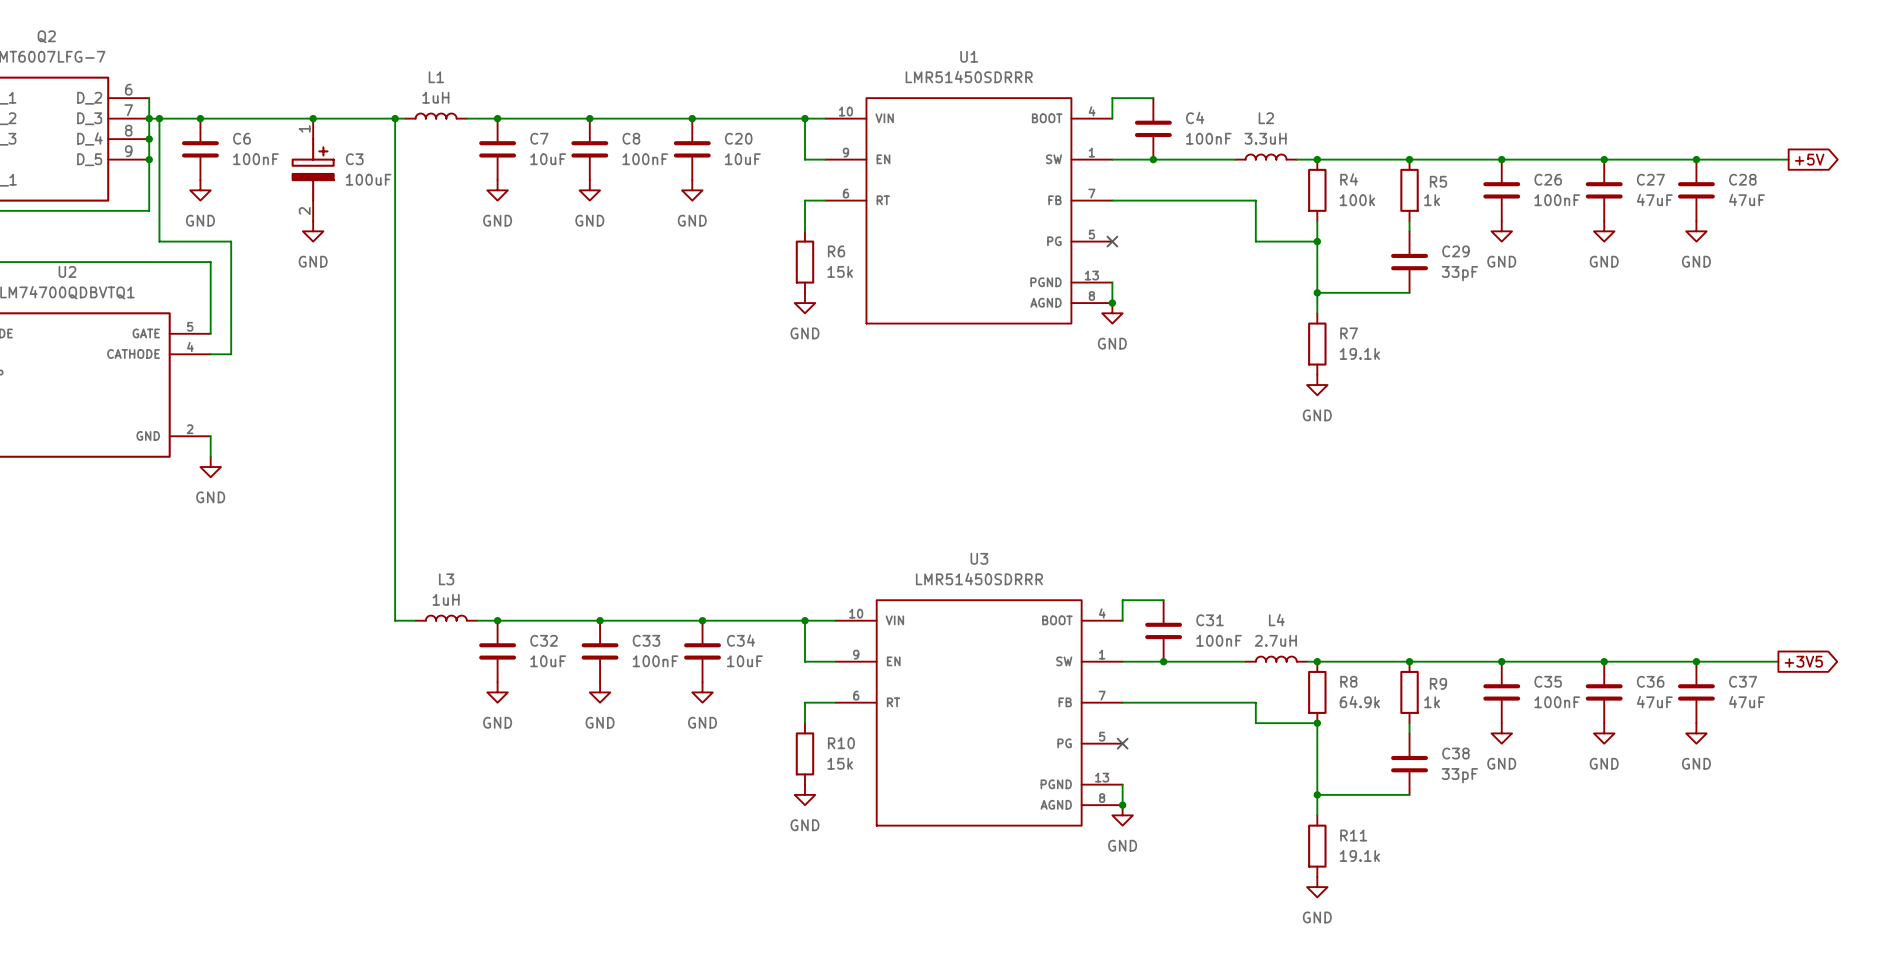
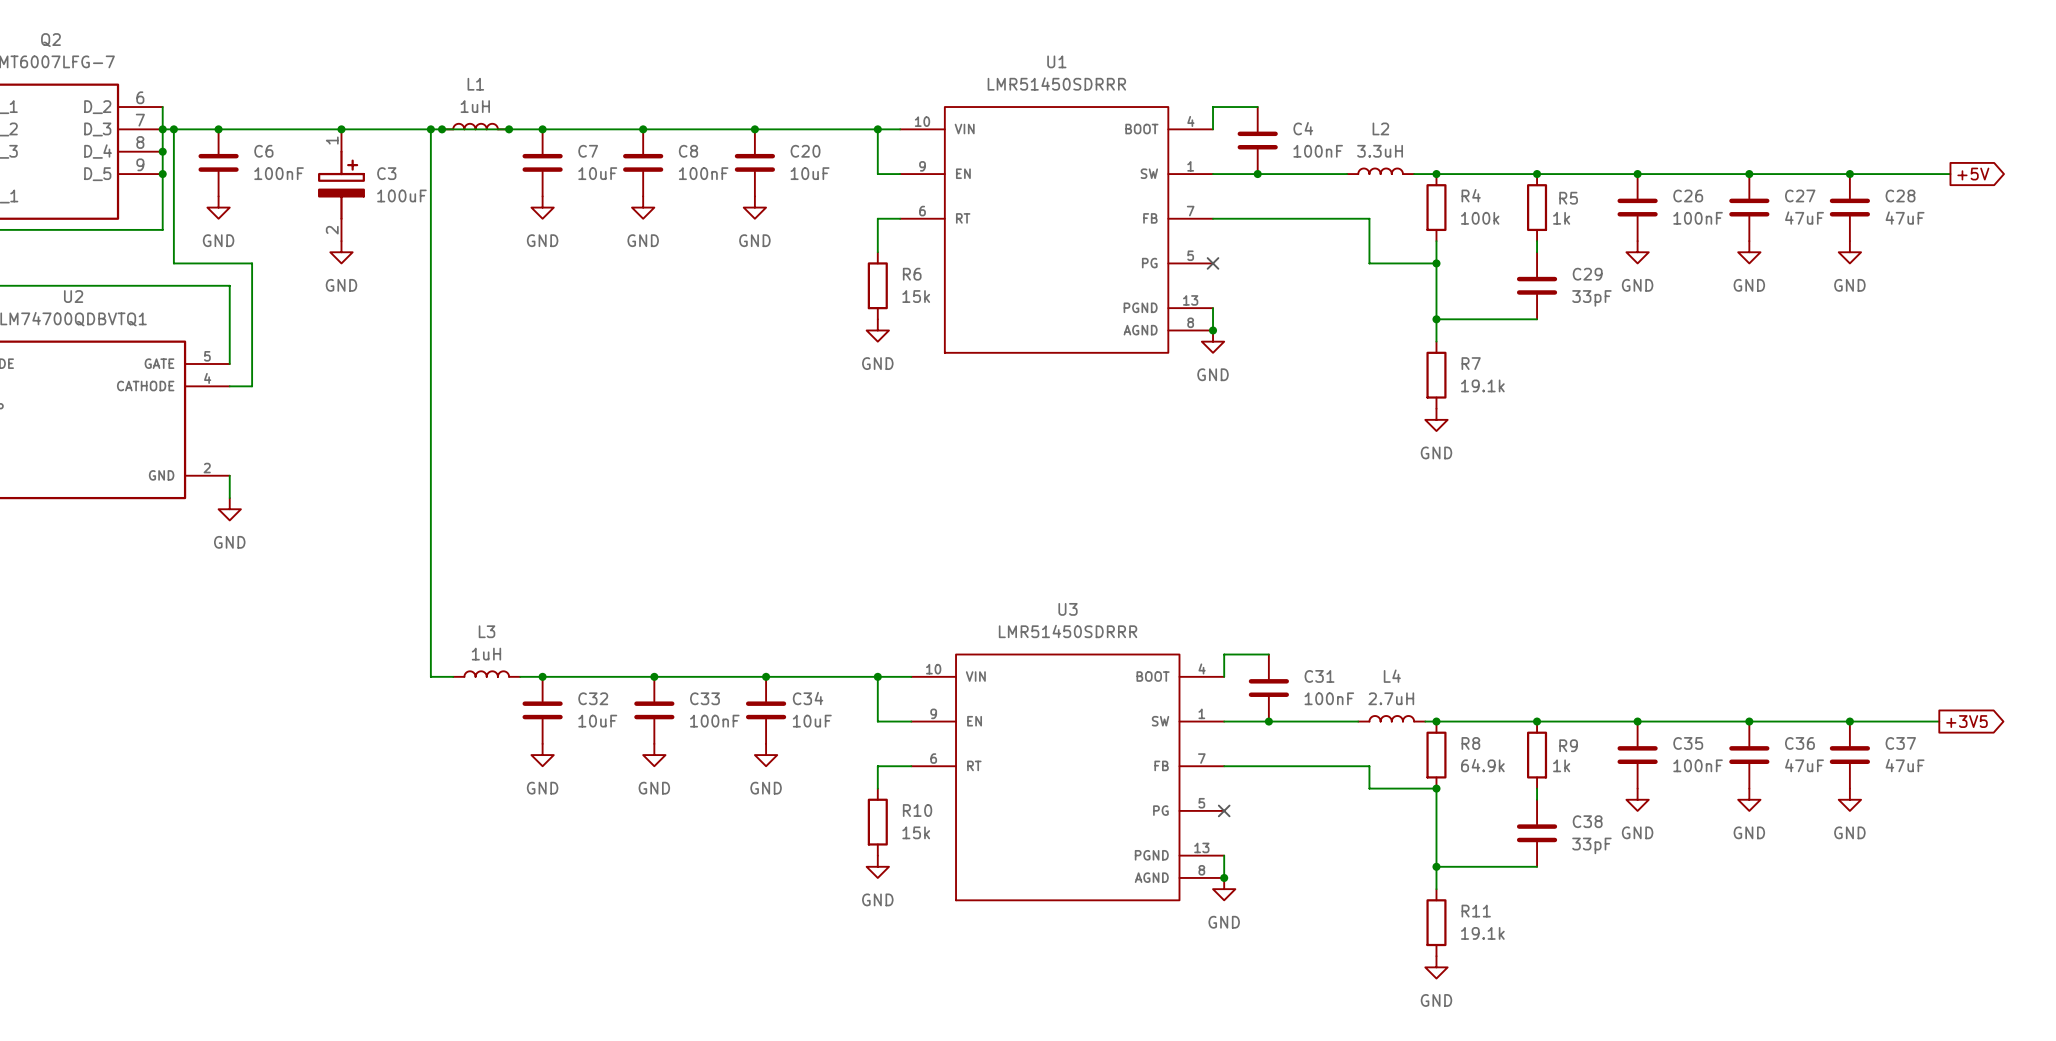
wire: none -> (442, 129) (509, 129)
junction: none -> (442, 129)
junction: none -> (509, 129)

